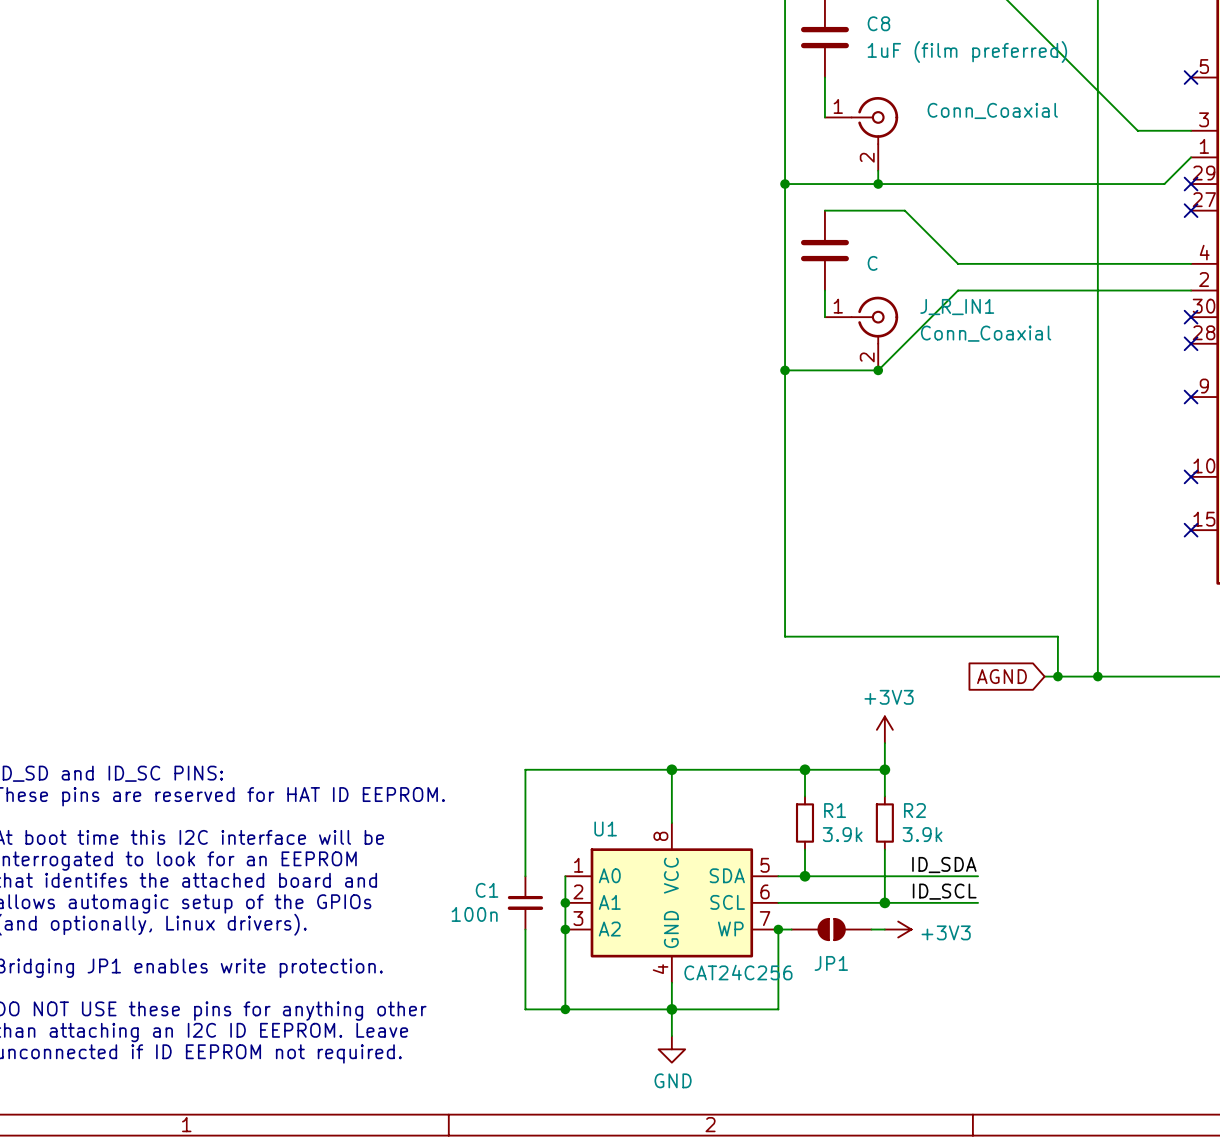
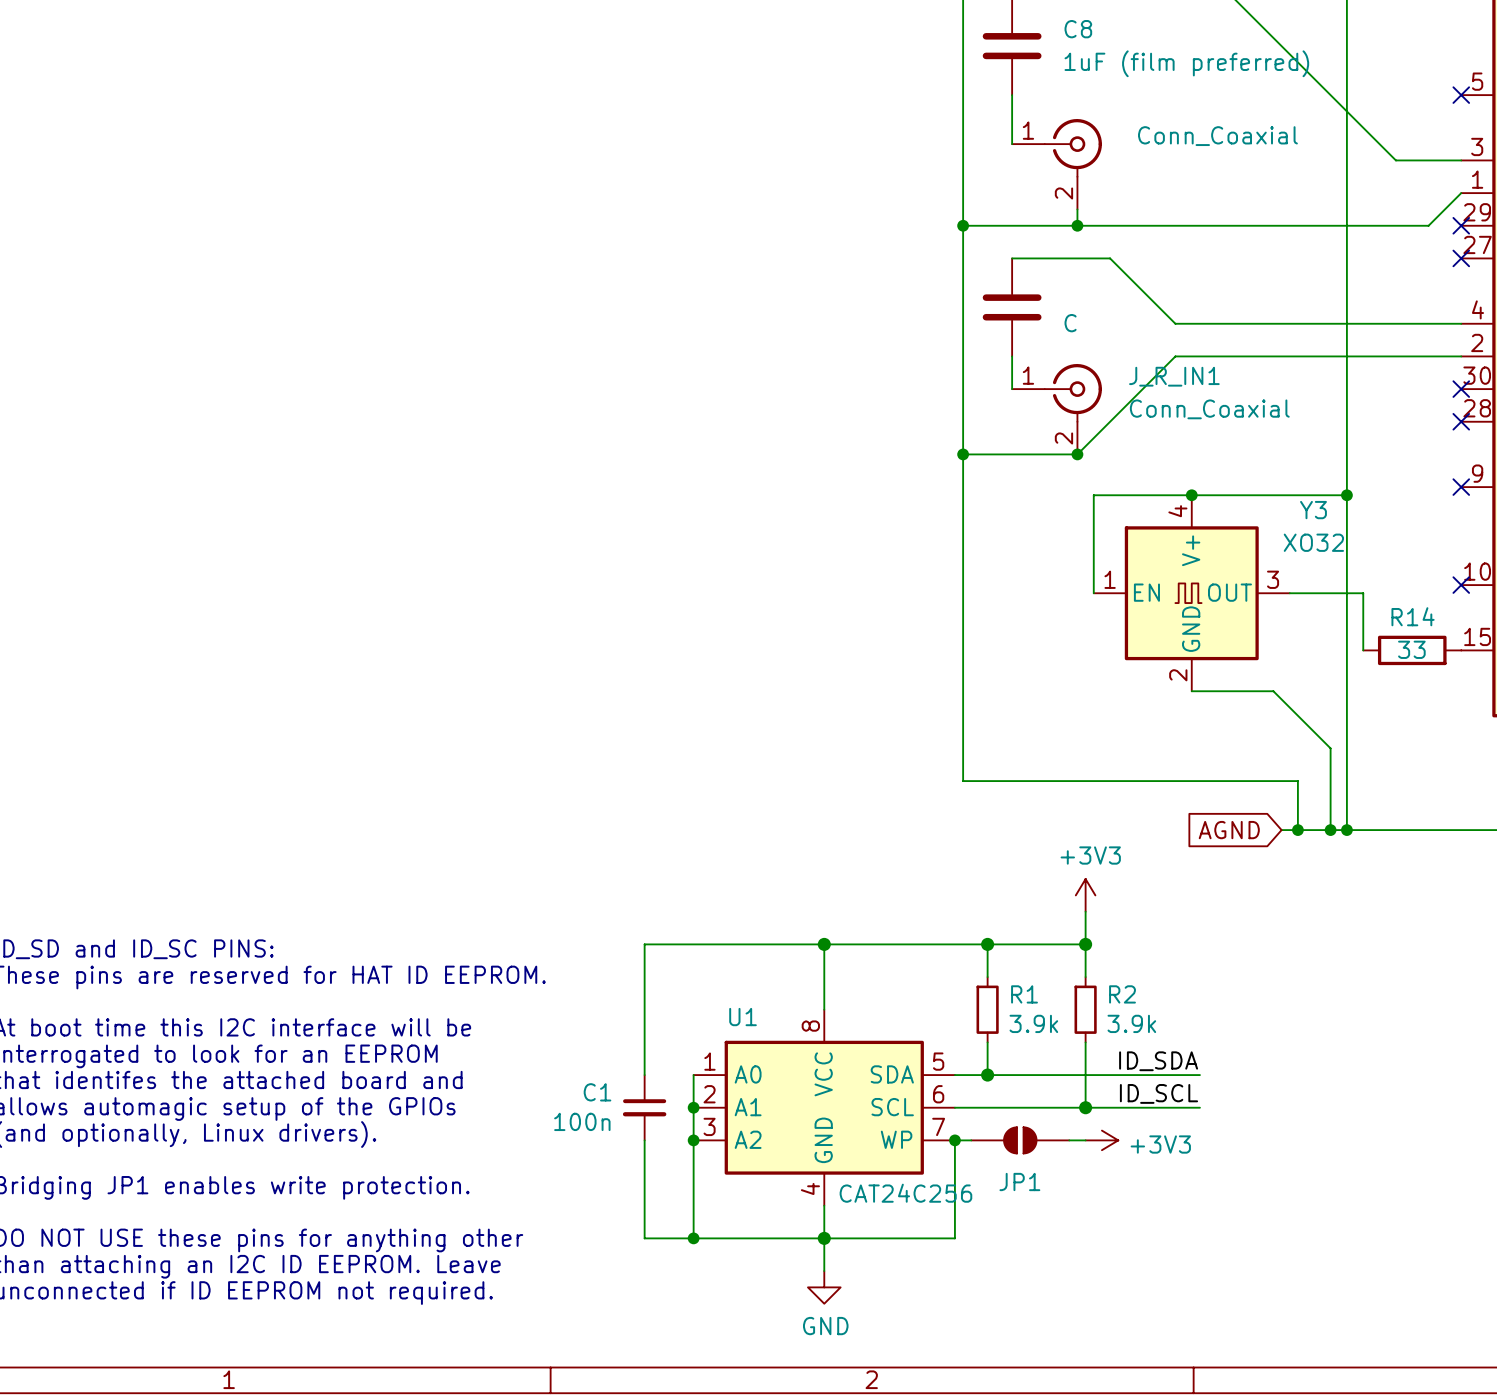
junction: none -> (1191, 495)
wire: none -> (1346, 495) (1093, 495) (1093, 593)
junction: none -> (1346, 495)
Y3: none -> XO32 (1191, 593)
wire: none -> (1289, 593) (1363, 593) (1363, 650)
R14: none -> 33 (1412, 650)
no-connect mark: (1191, 530) -> none
wire: none -> (1191, 691) (1273, 691) (1330, 748) (1330, 830)
junction: none -> (1330, 830)

